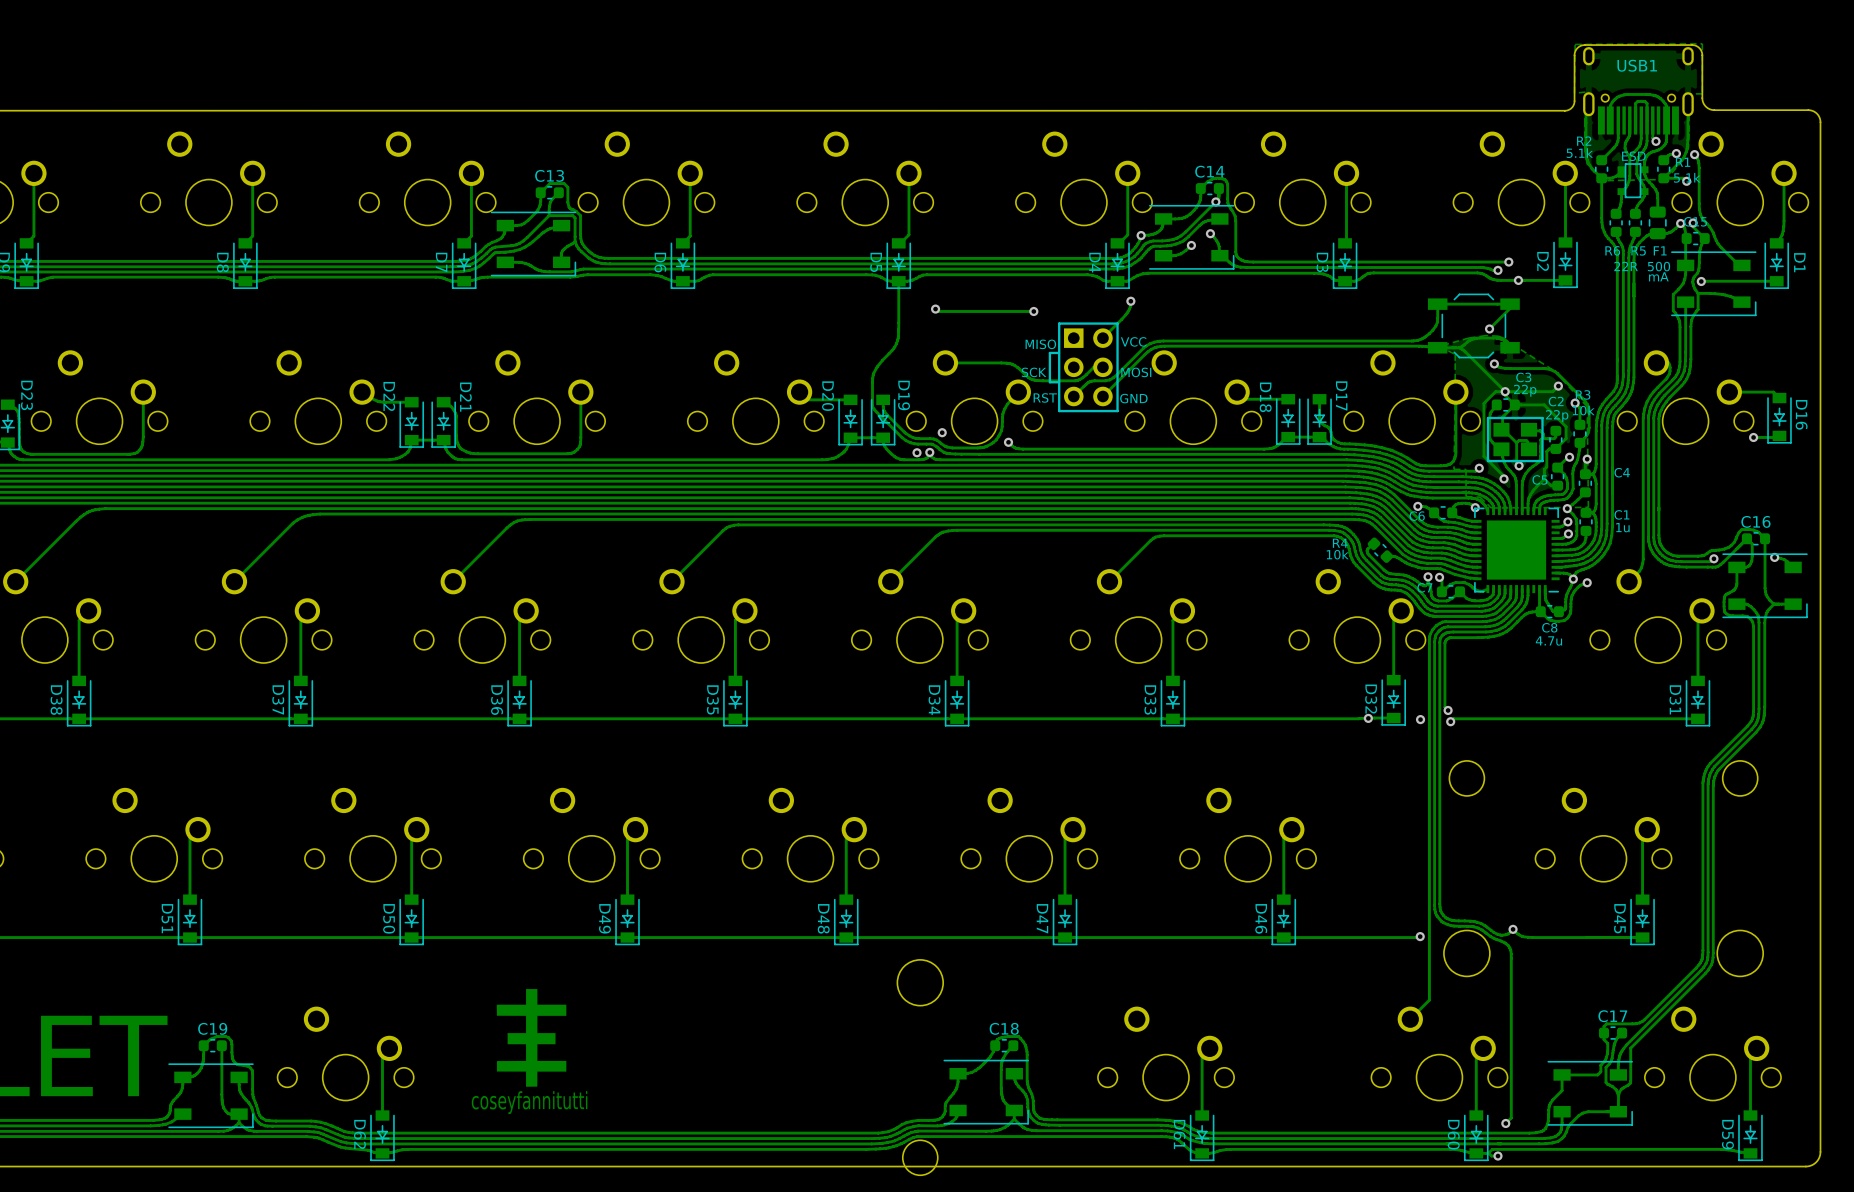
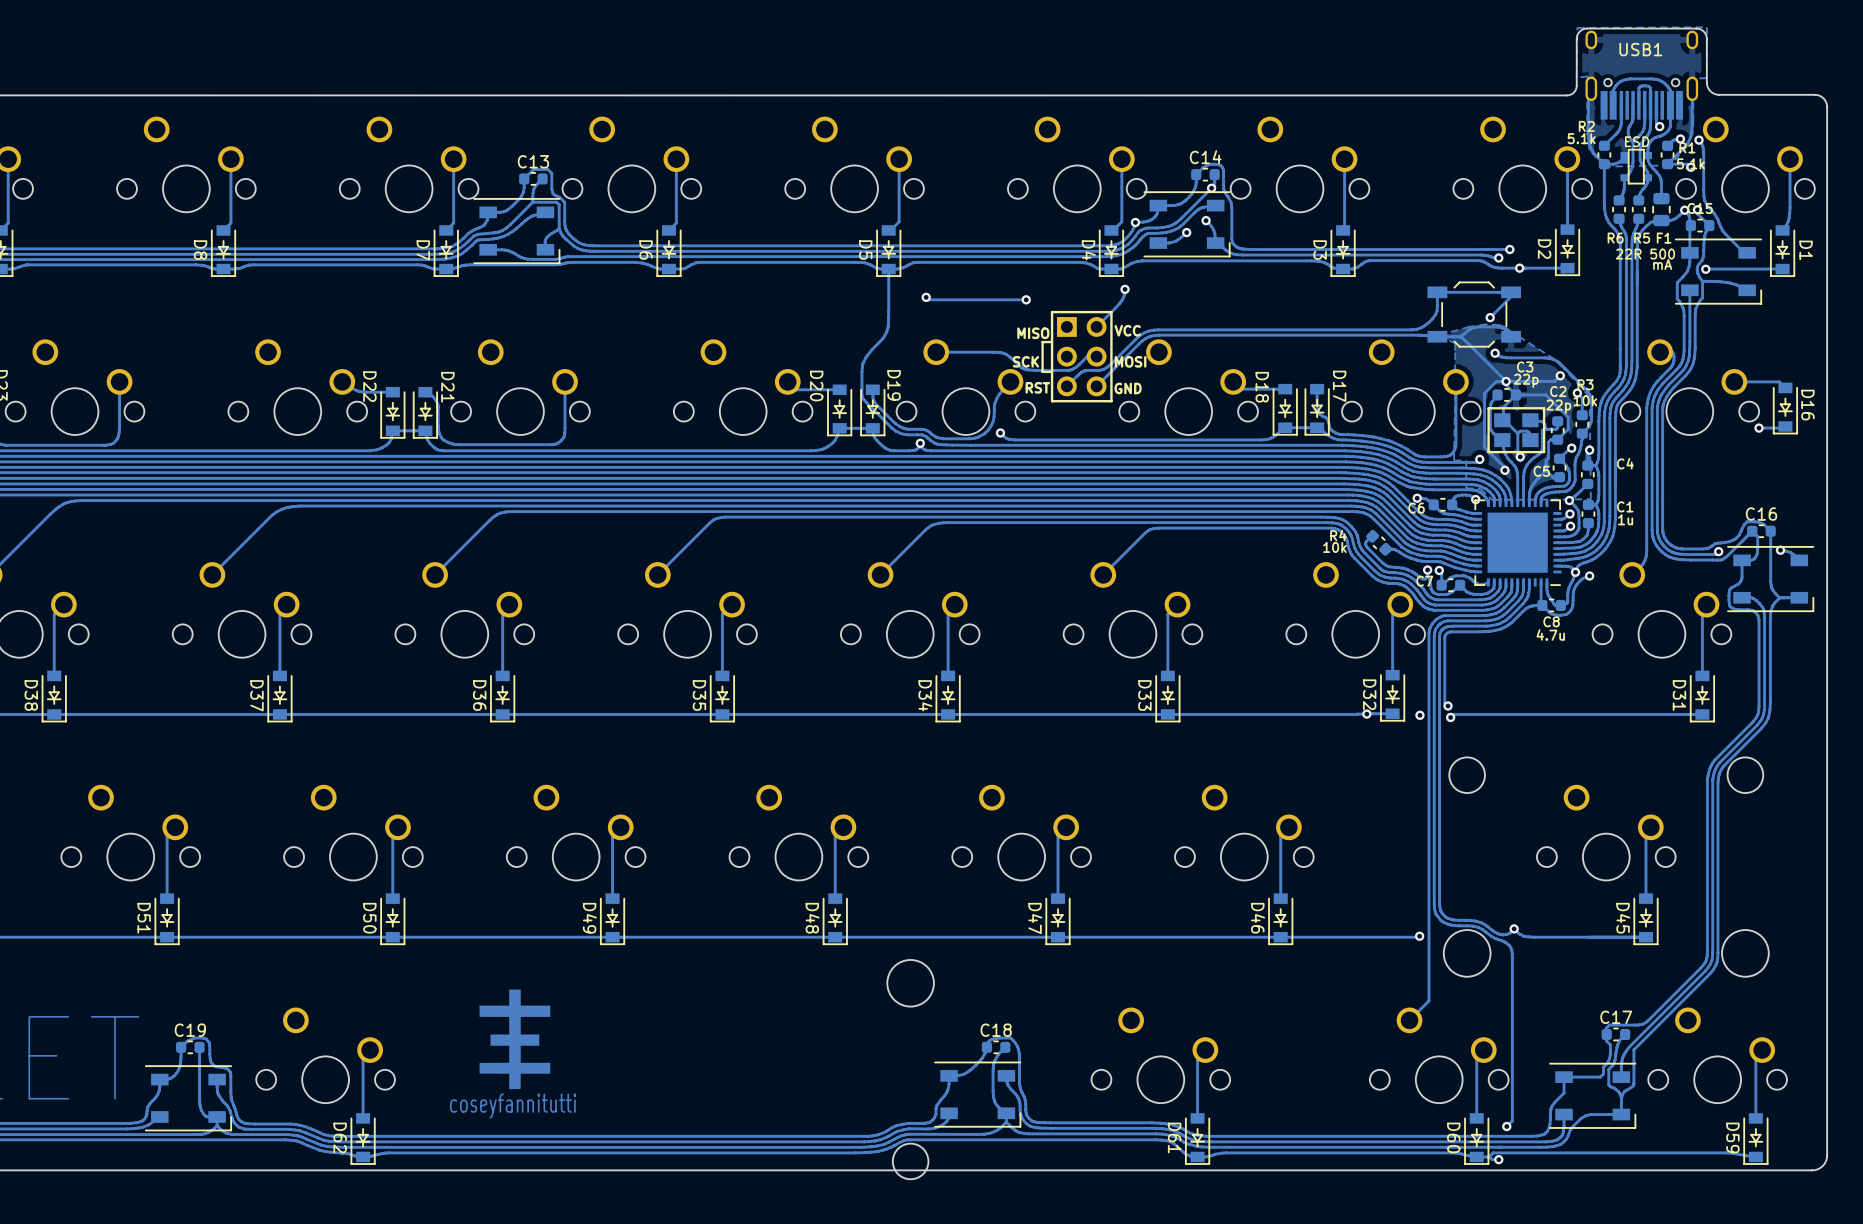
via: (942, 432) -> none
via: (917, 452) -> none

